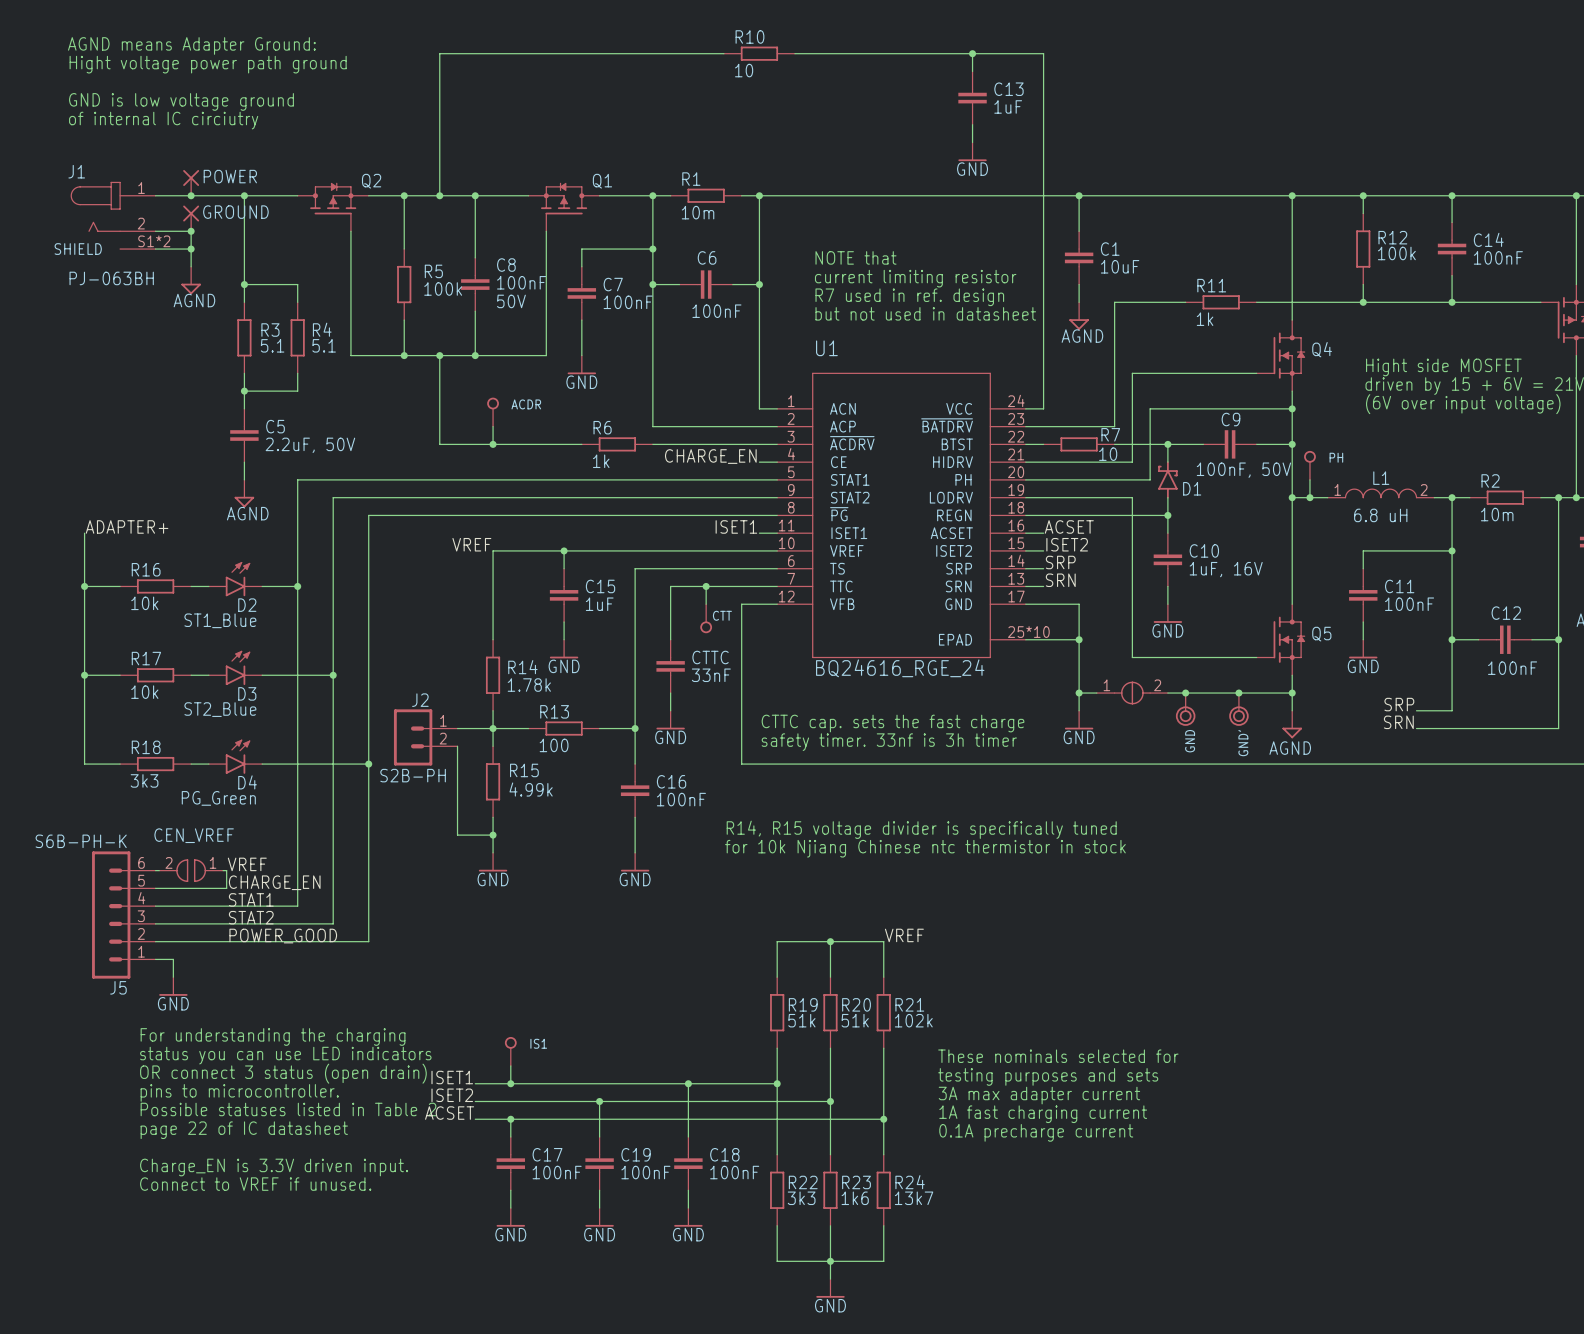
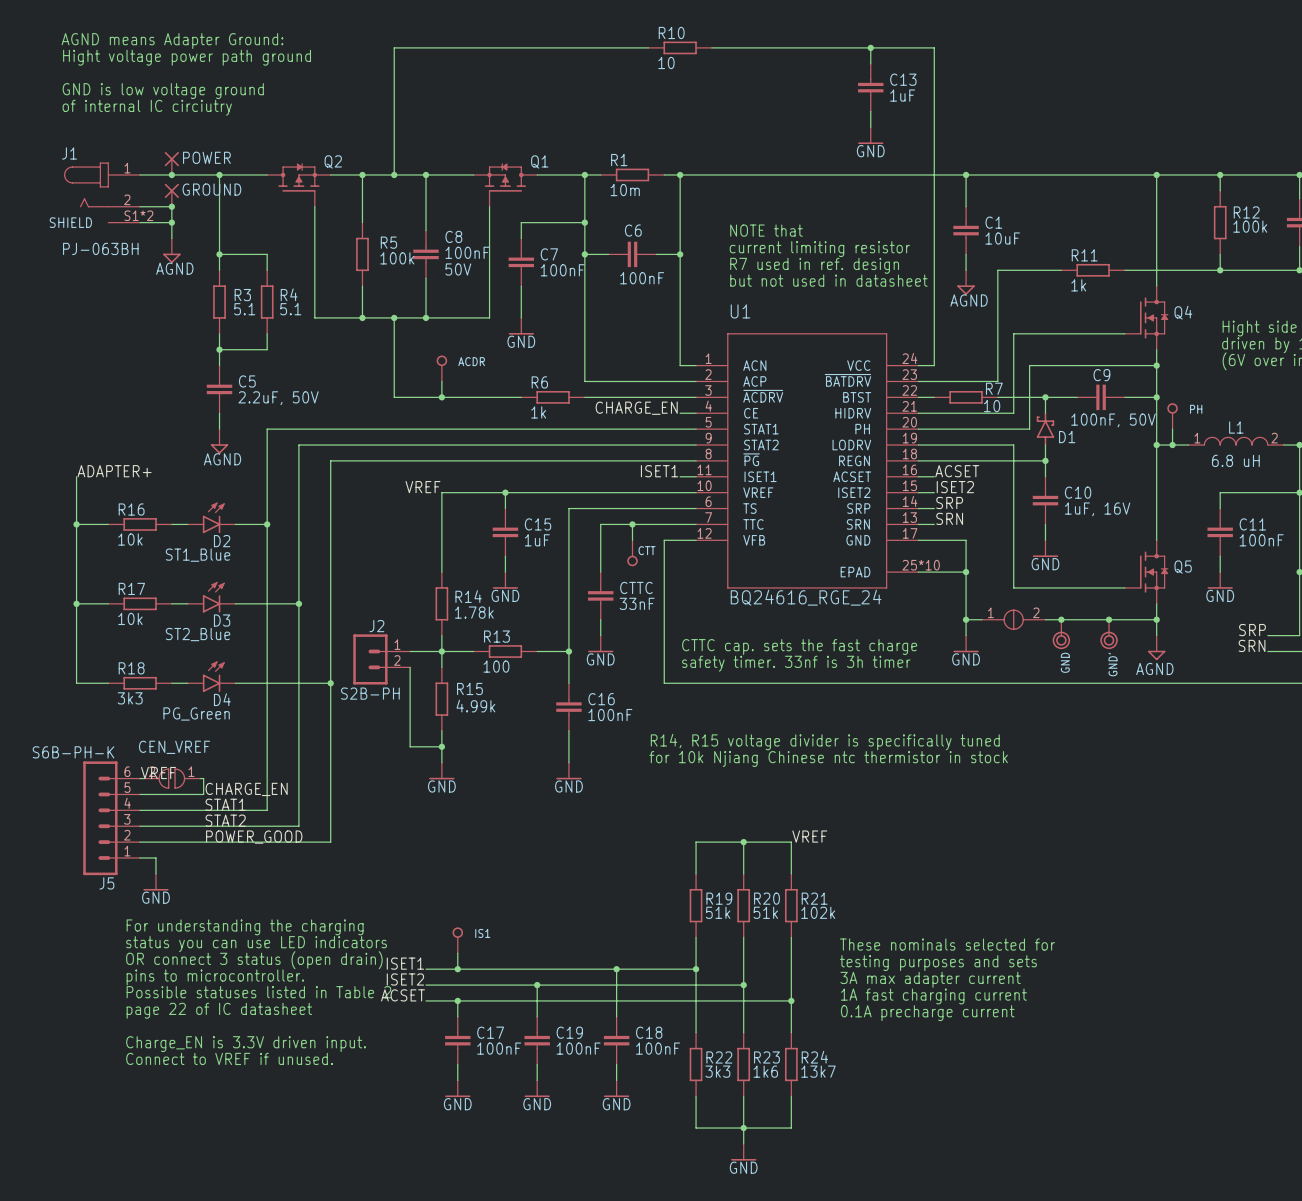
label position: VREF (247, 864) -> VREF (158, 773)

